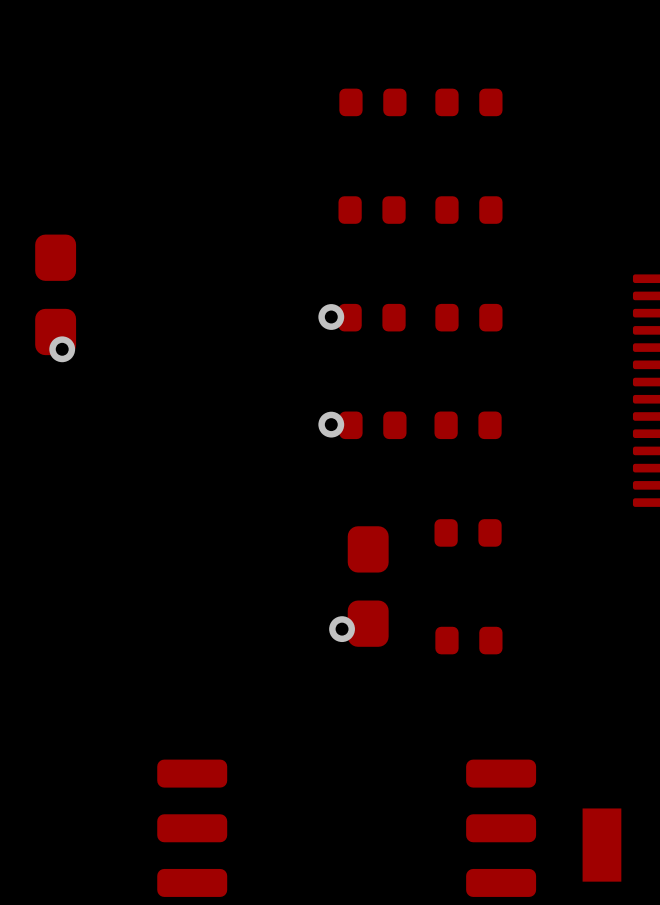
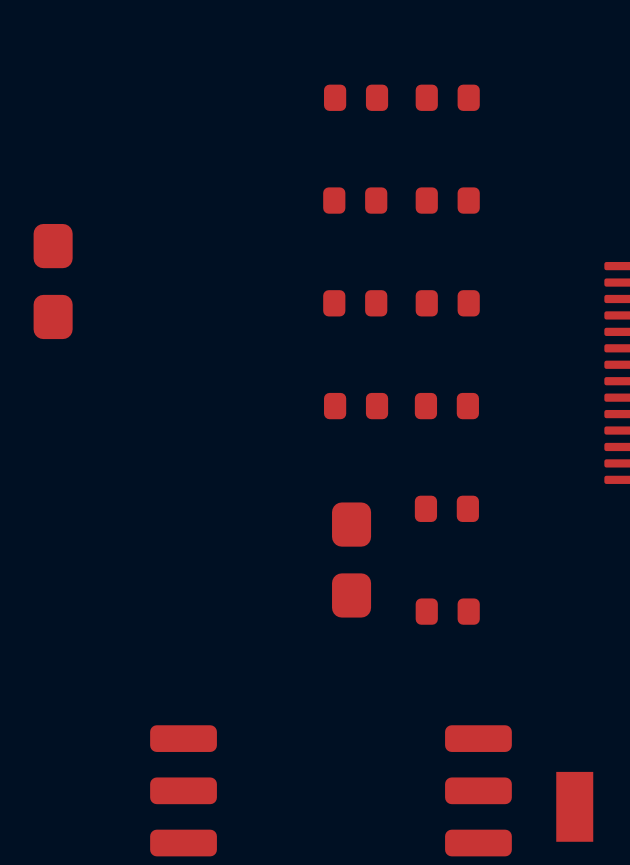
via: (331, 317) -> none
via: (62, 349) -> none
via: (331, 424) -> none
via: (342, 629) -> none

